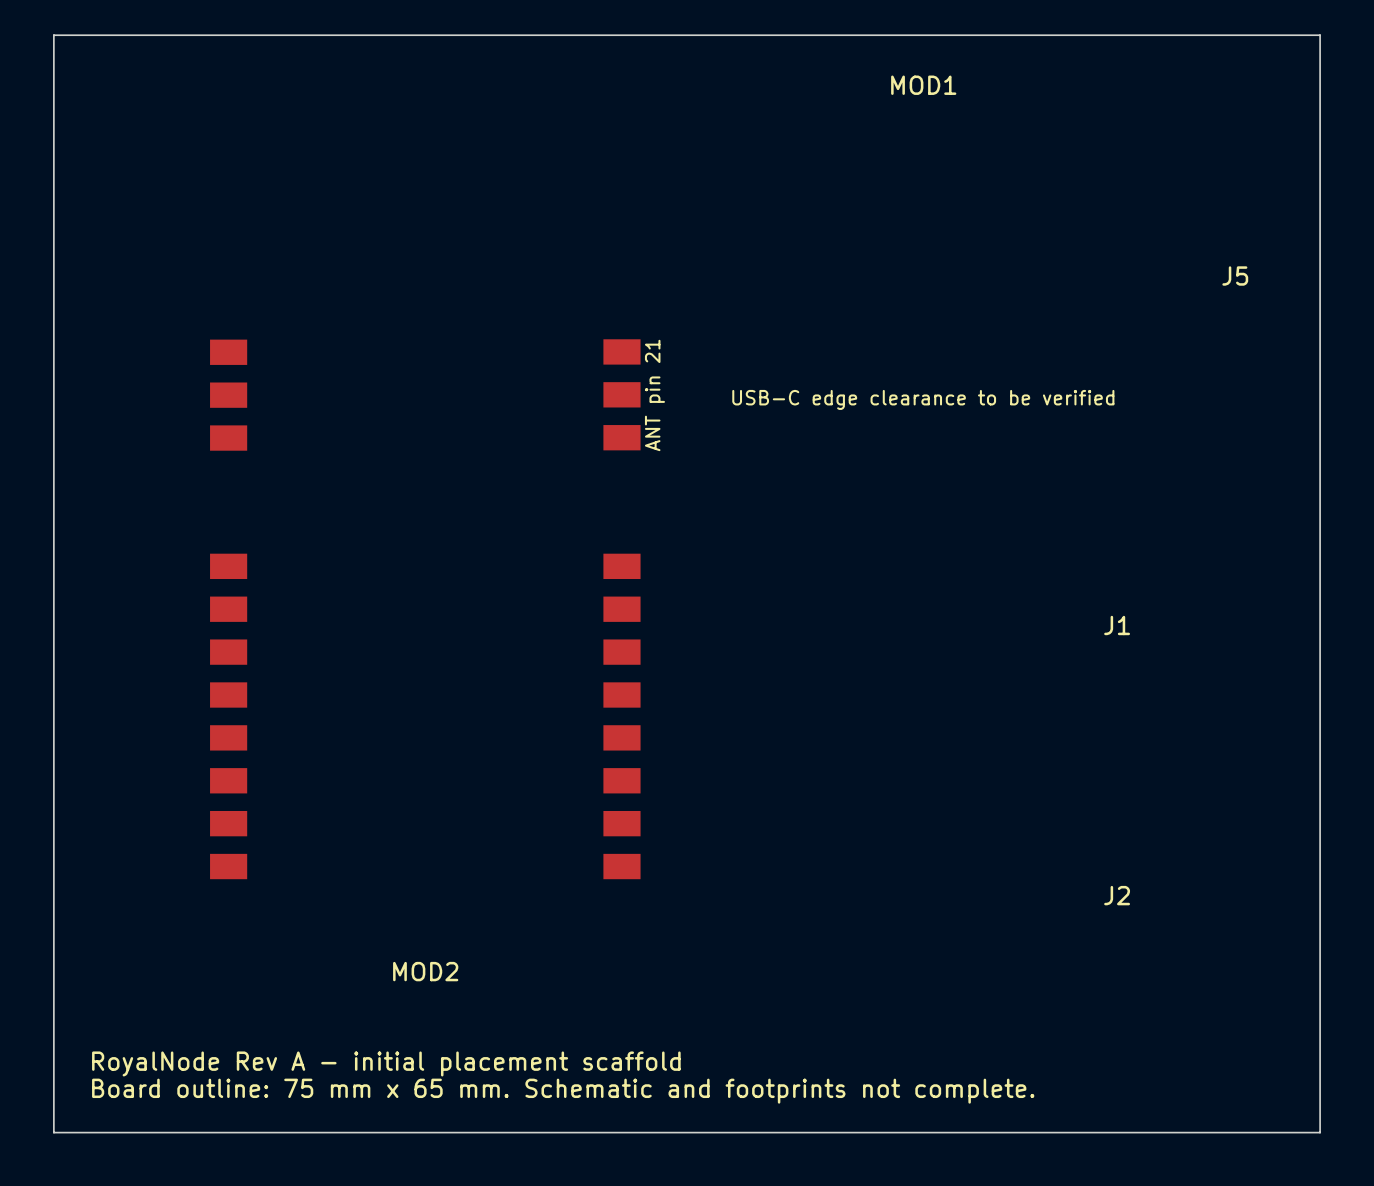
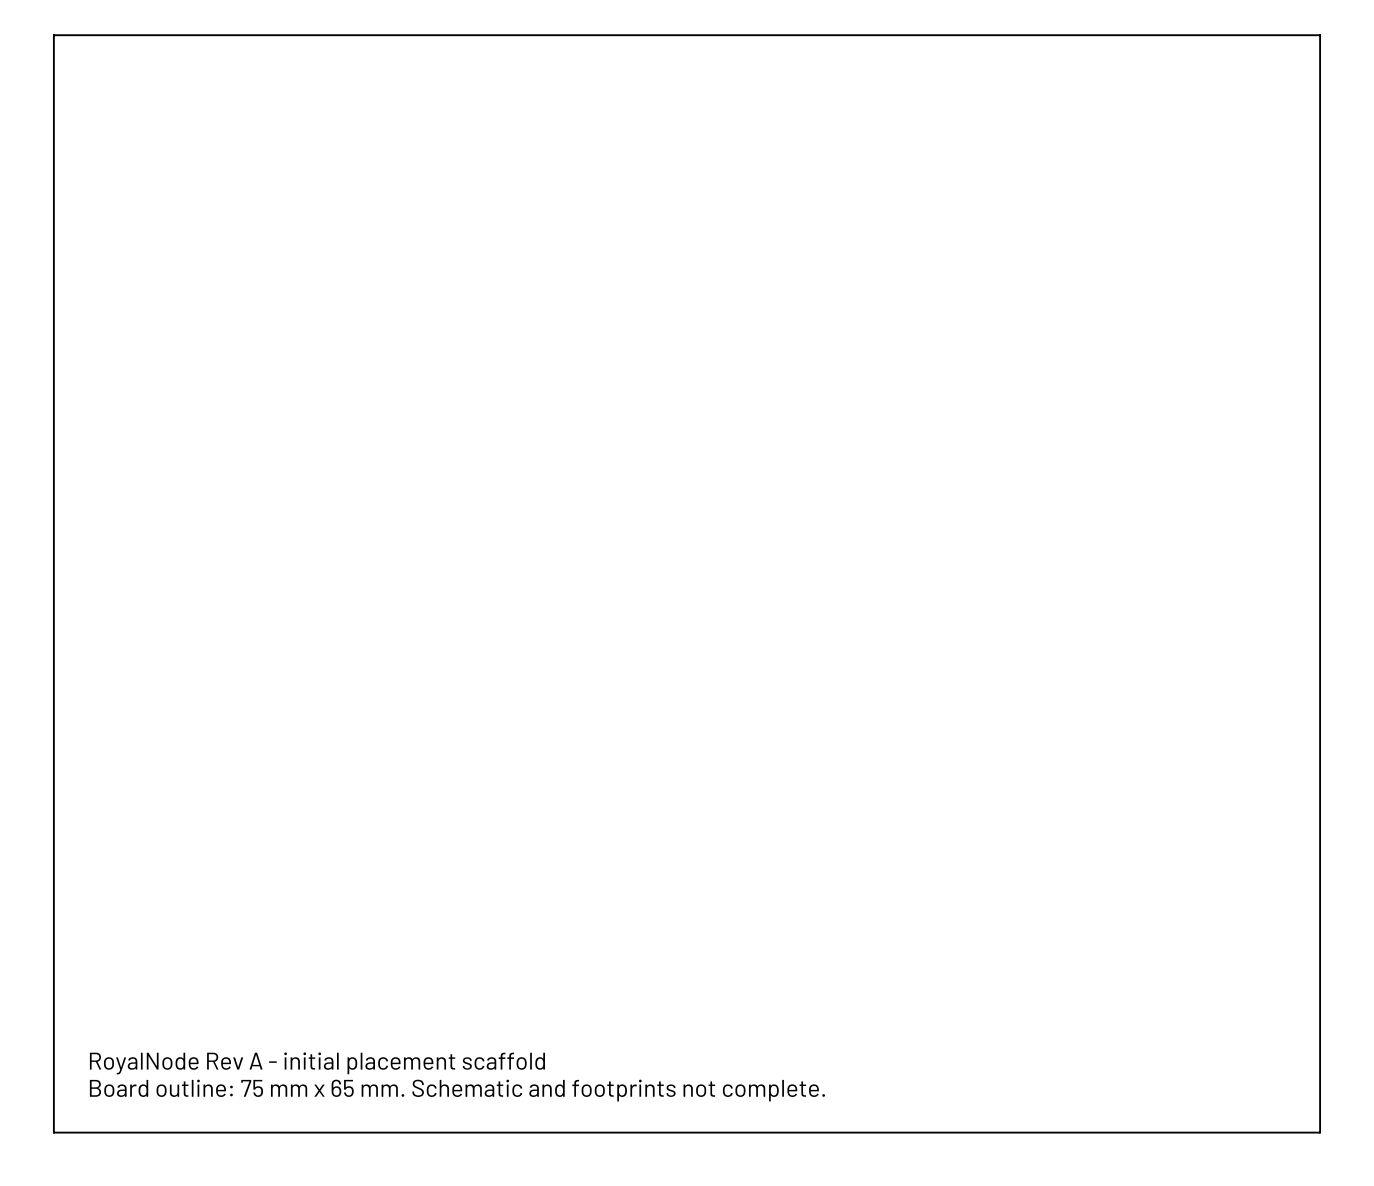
MOD1: (923, 242) -> none
J5: (1235, 276) -> none
MOD2: (425, 609) -> none
J1: (1117, 625) -> none
J2: (1117, 895) -> none

